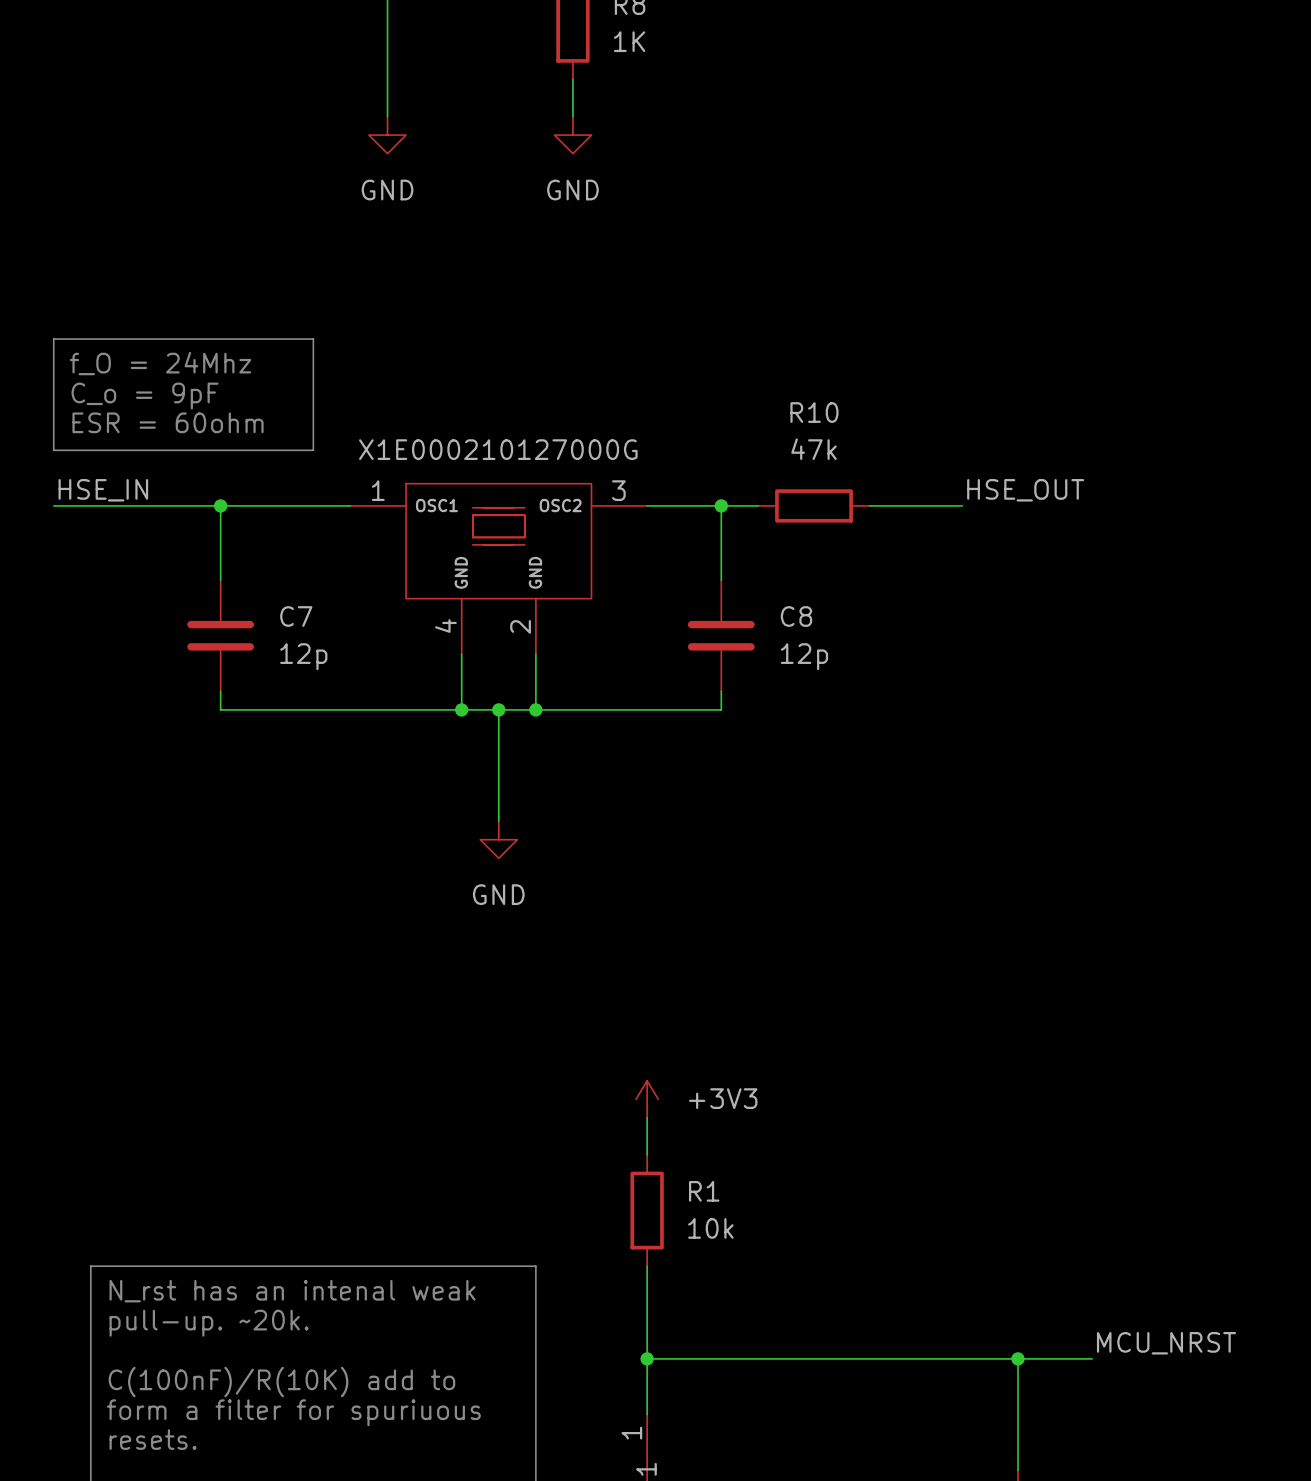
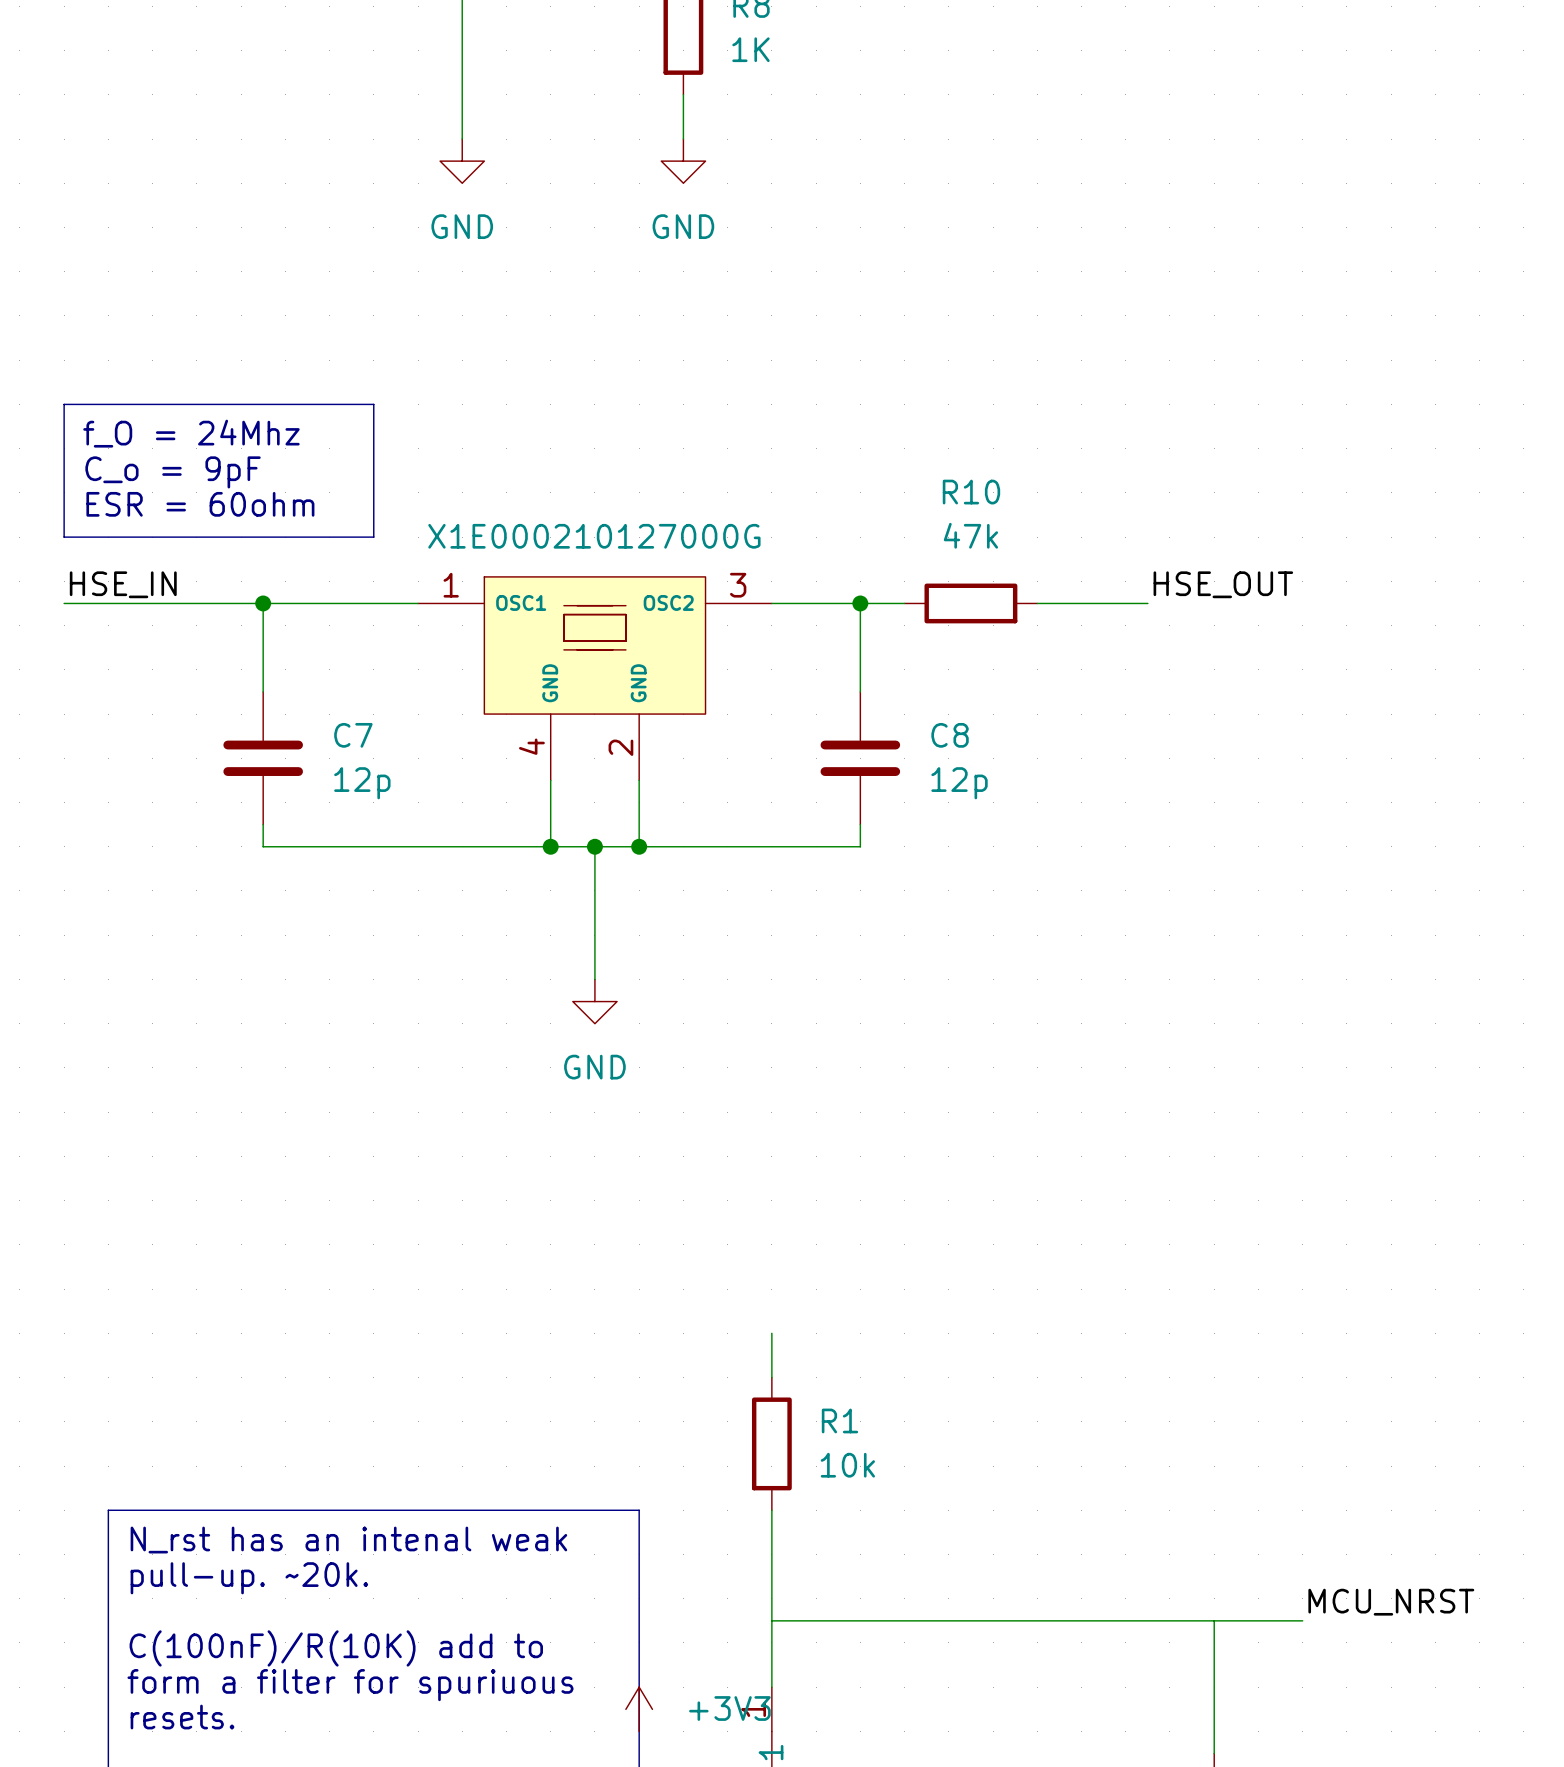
power symbol position: +3V3 (647, 1099) -> +3V3 (639, 1709)
junction: (647, 1358) -> none
junction: (1017, 1358) -> none

